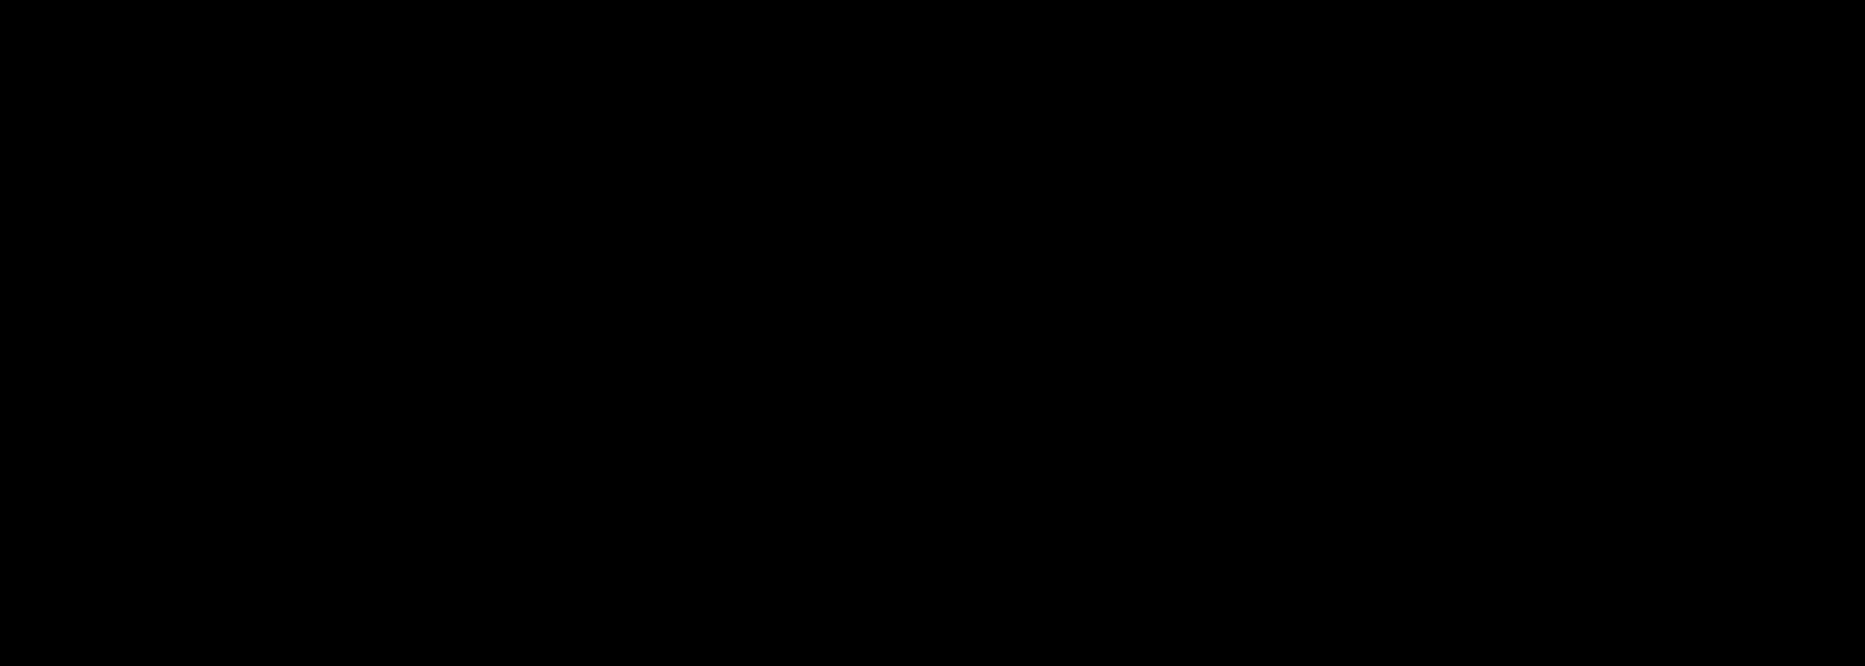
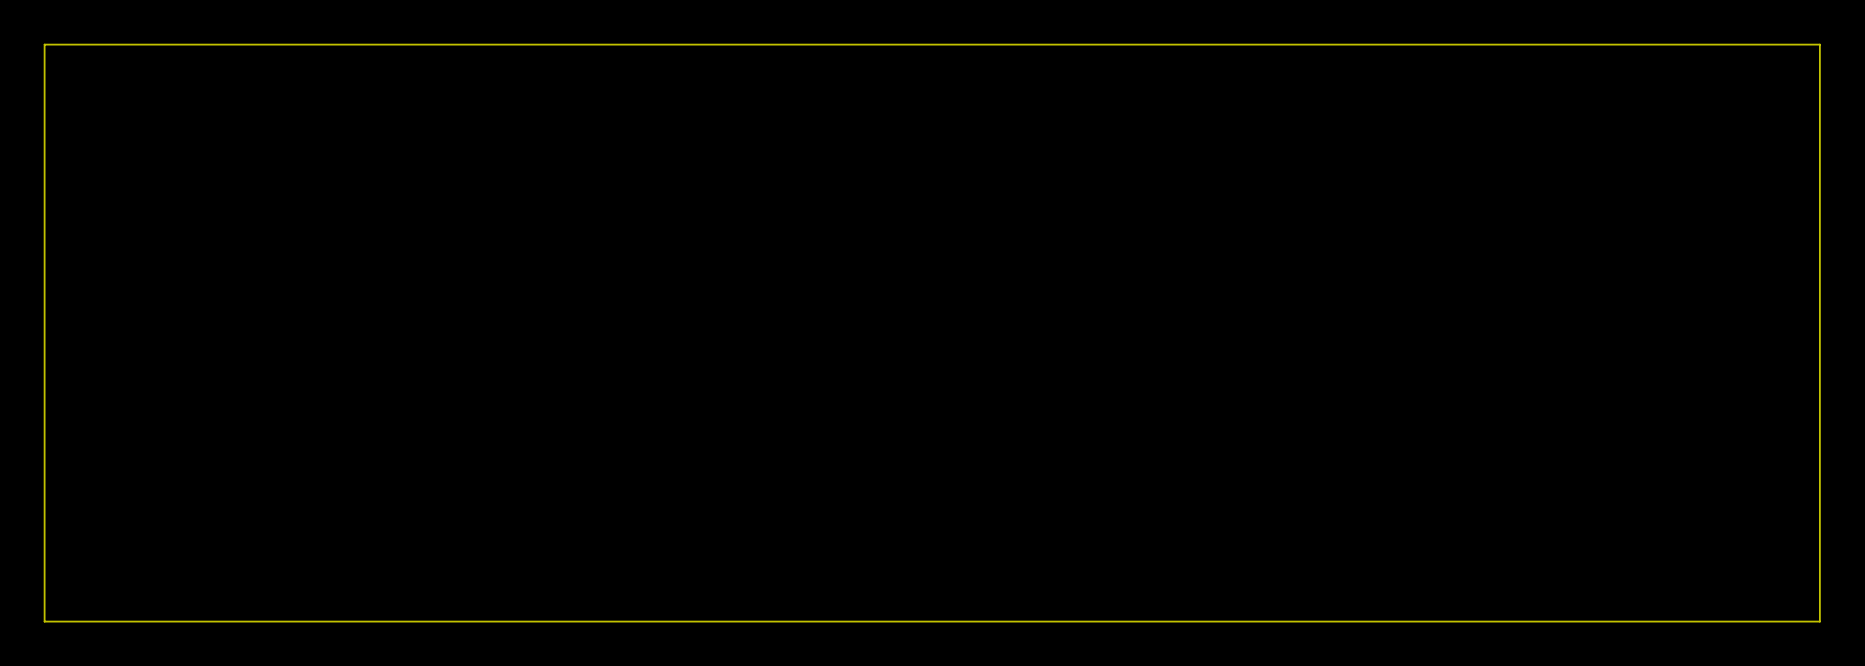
board edge: none -> (44, 44) (1819, 44) (1819, 621) (44, 621) (44, 44)

